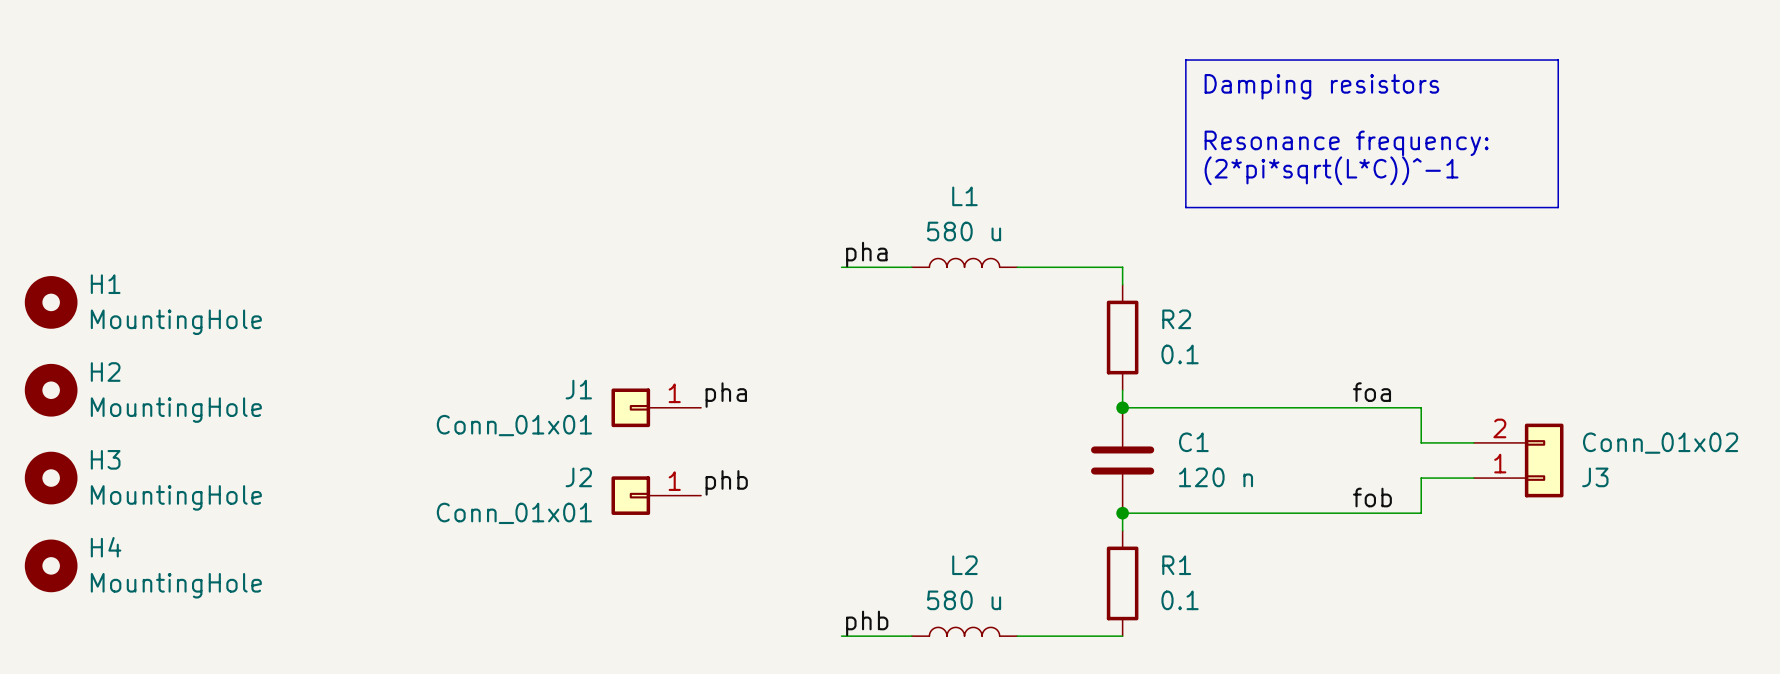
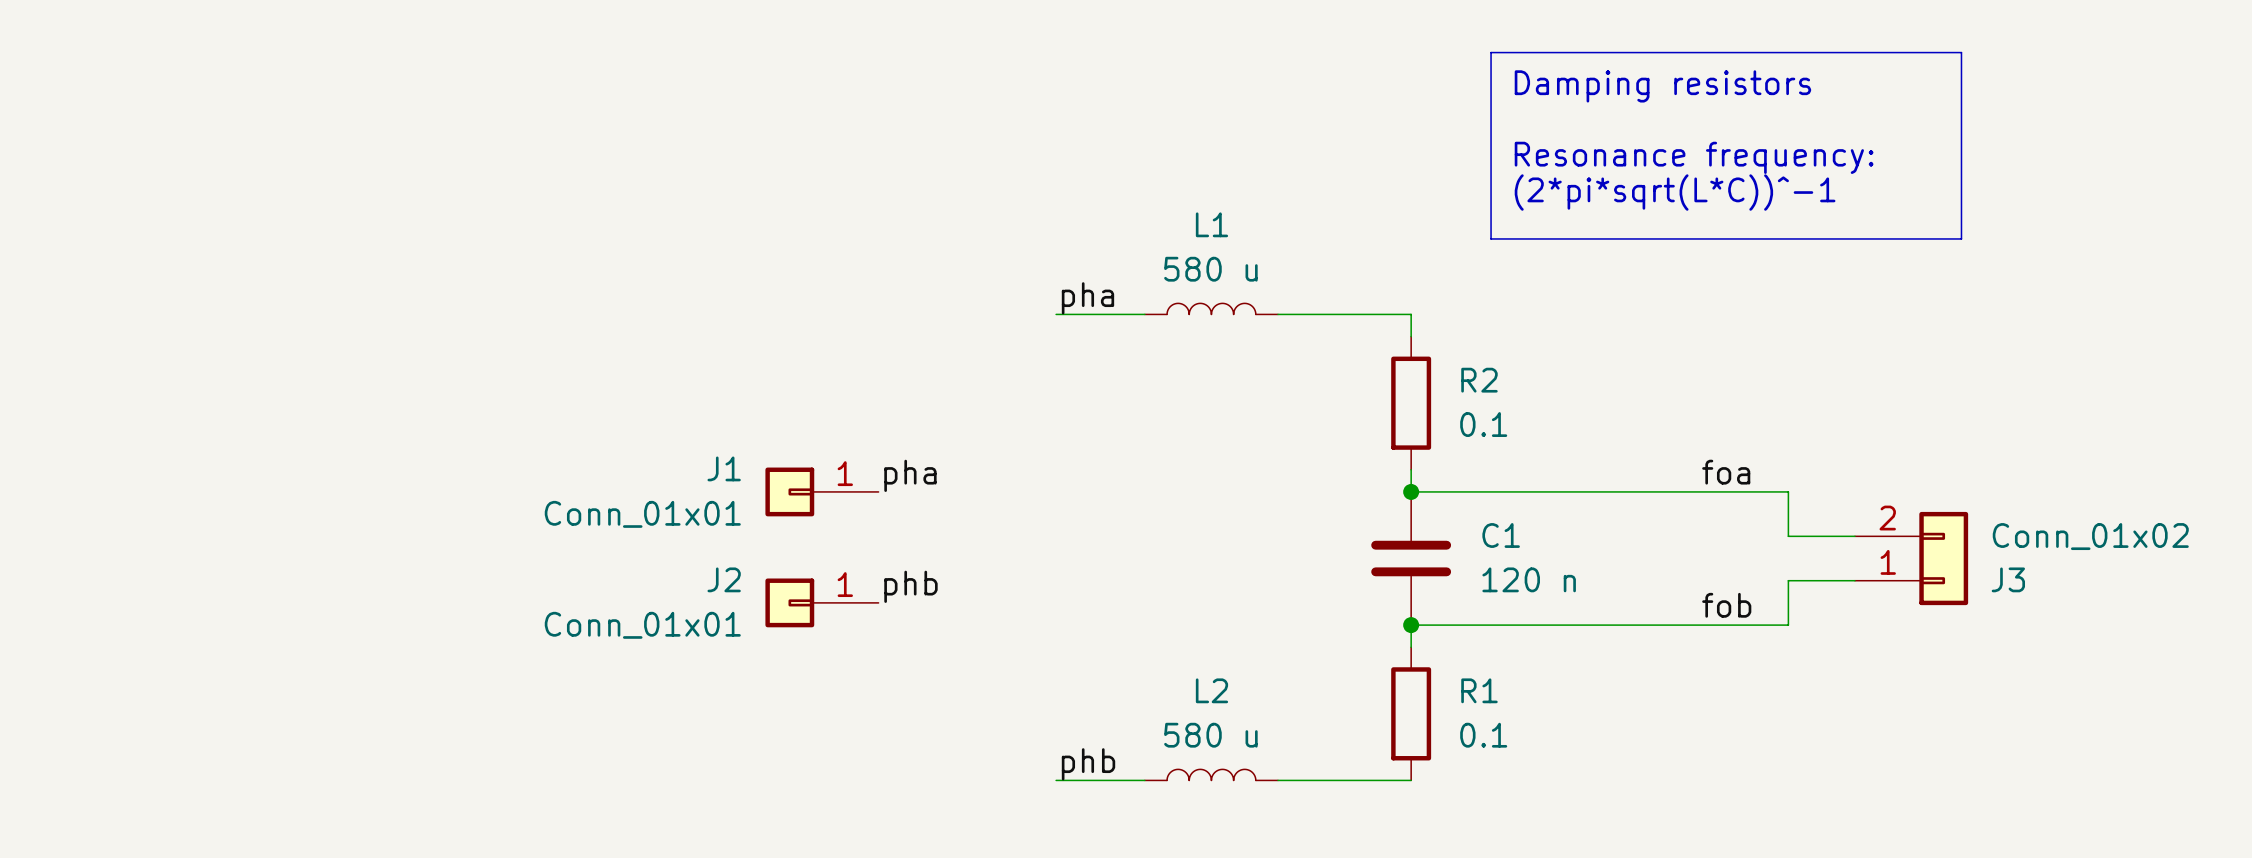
H1: MountingHole (51, 302) -> none
H2: MountingHole (51, 390) -> none
H3: MountingHole (51, 478) -> none
H4: MountingHole (51, 565) -> none

